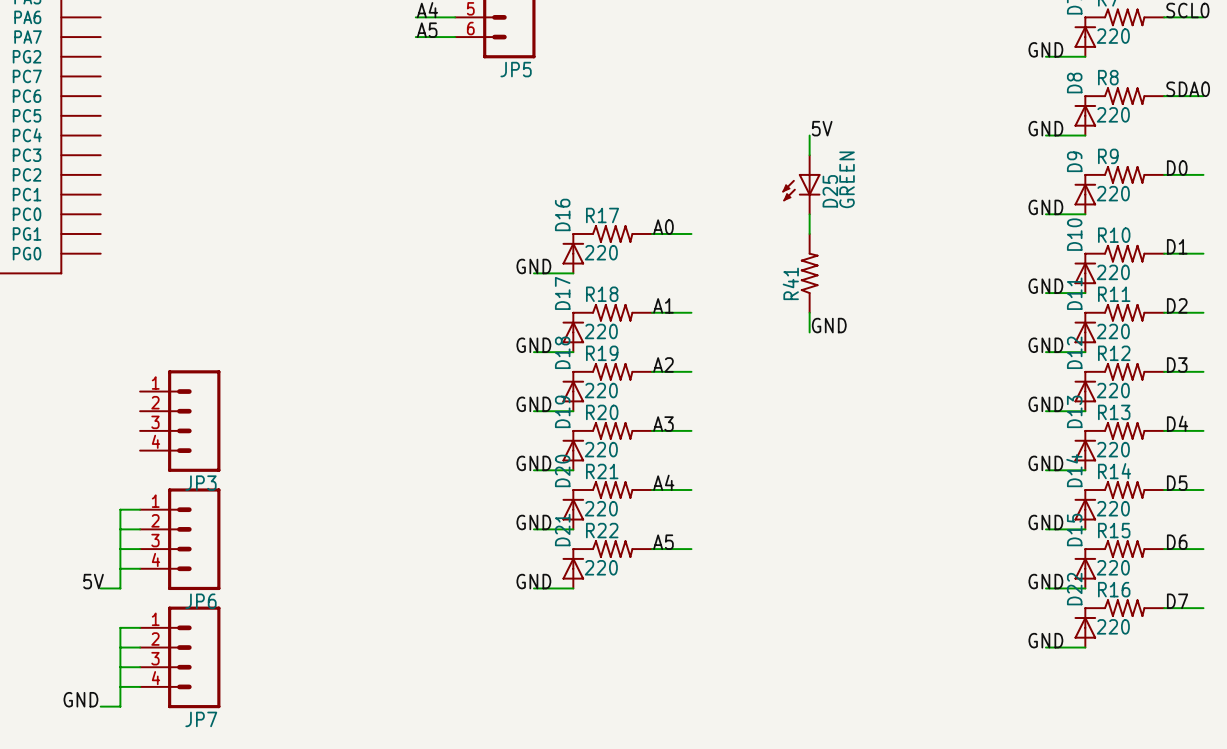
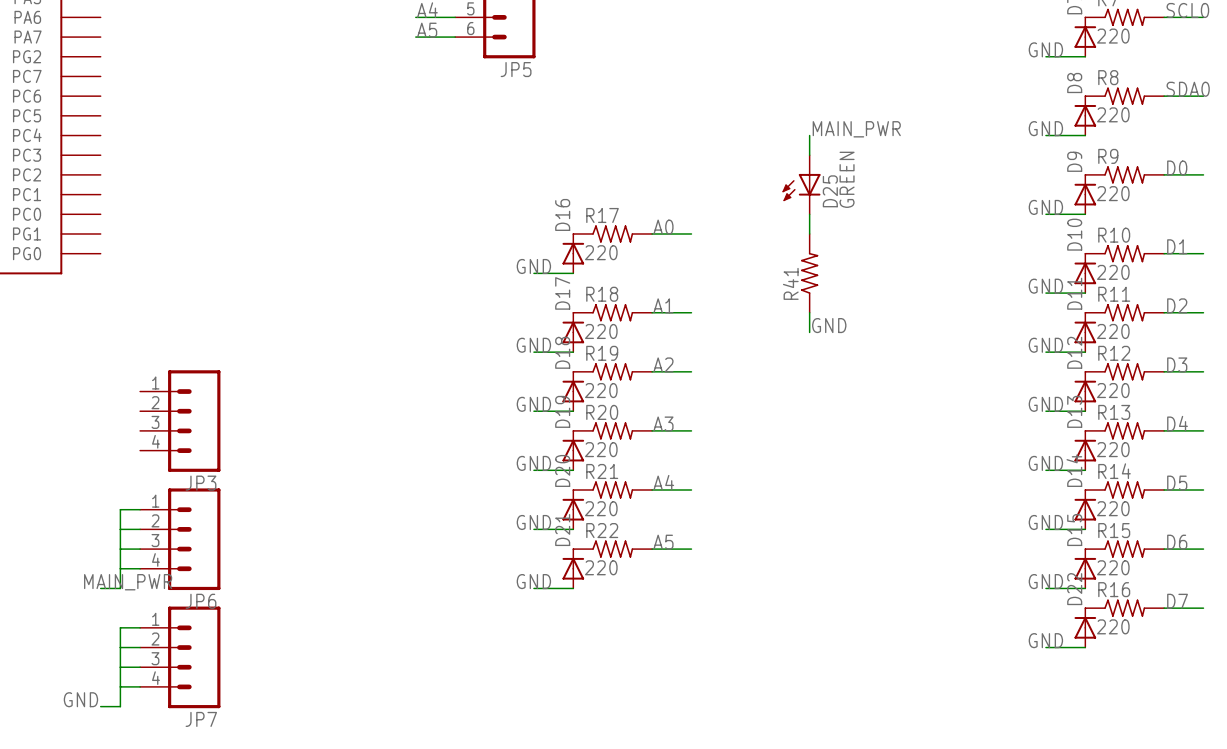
label: 5V (822, 128) -> MAIN_PWR (856, 129)
label: 5V (93, 581) -> MAIN_PWR (128, 582)

